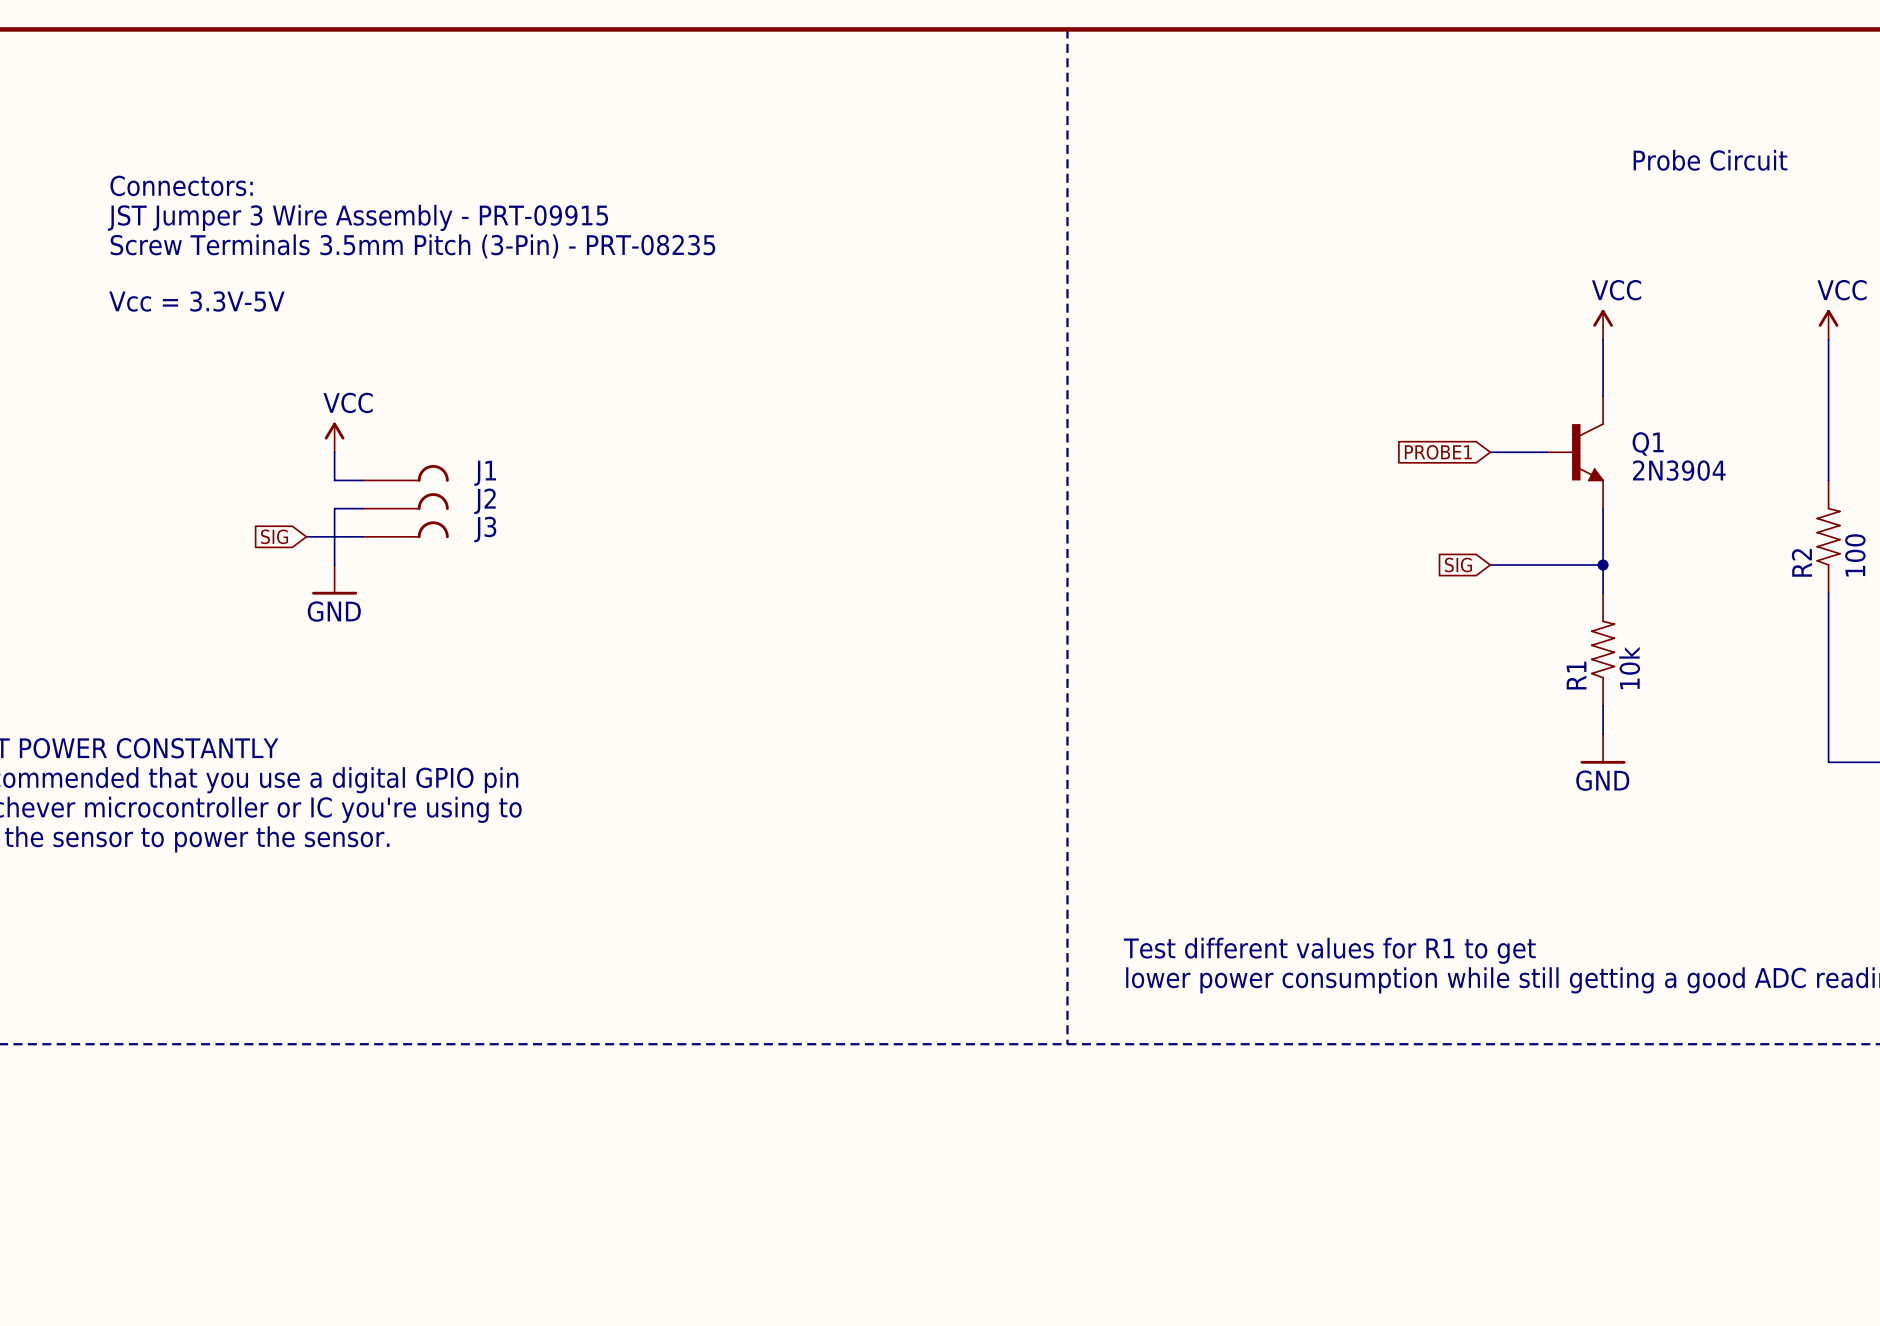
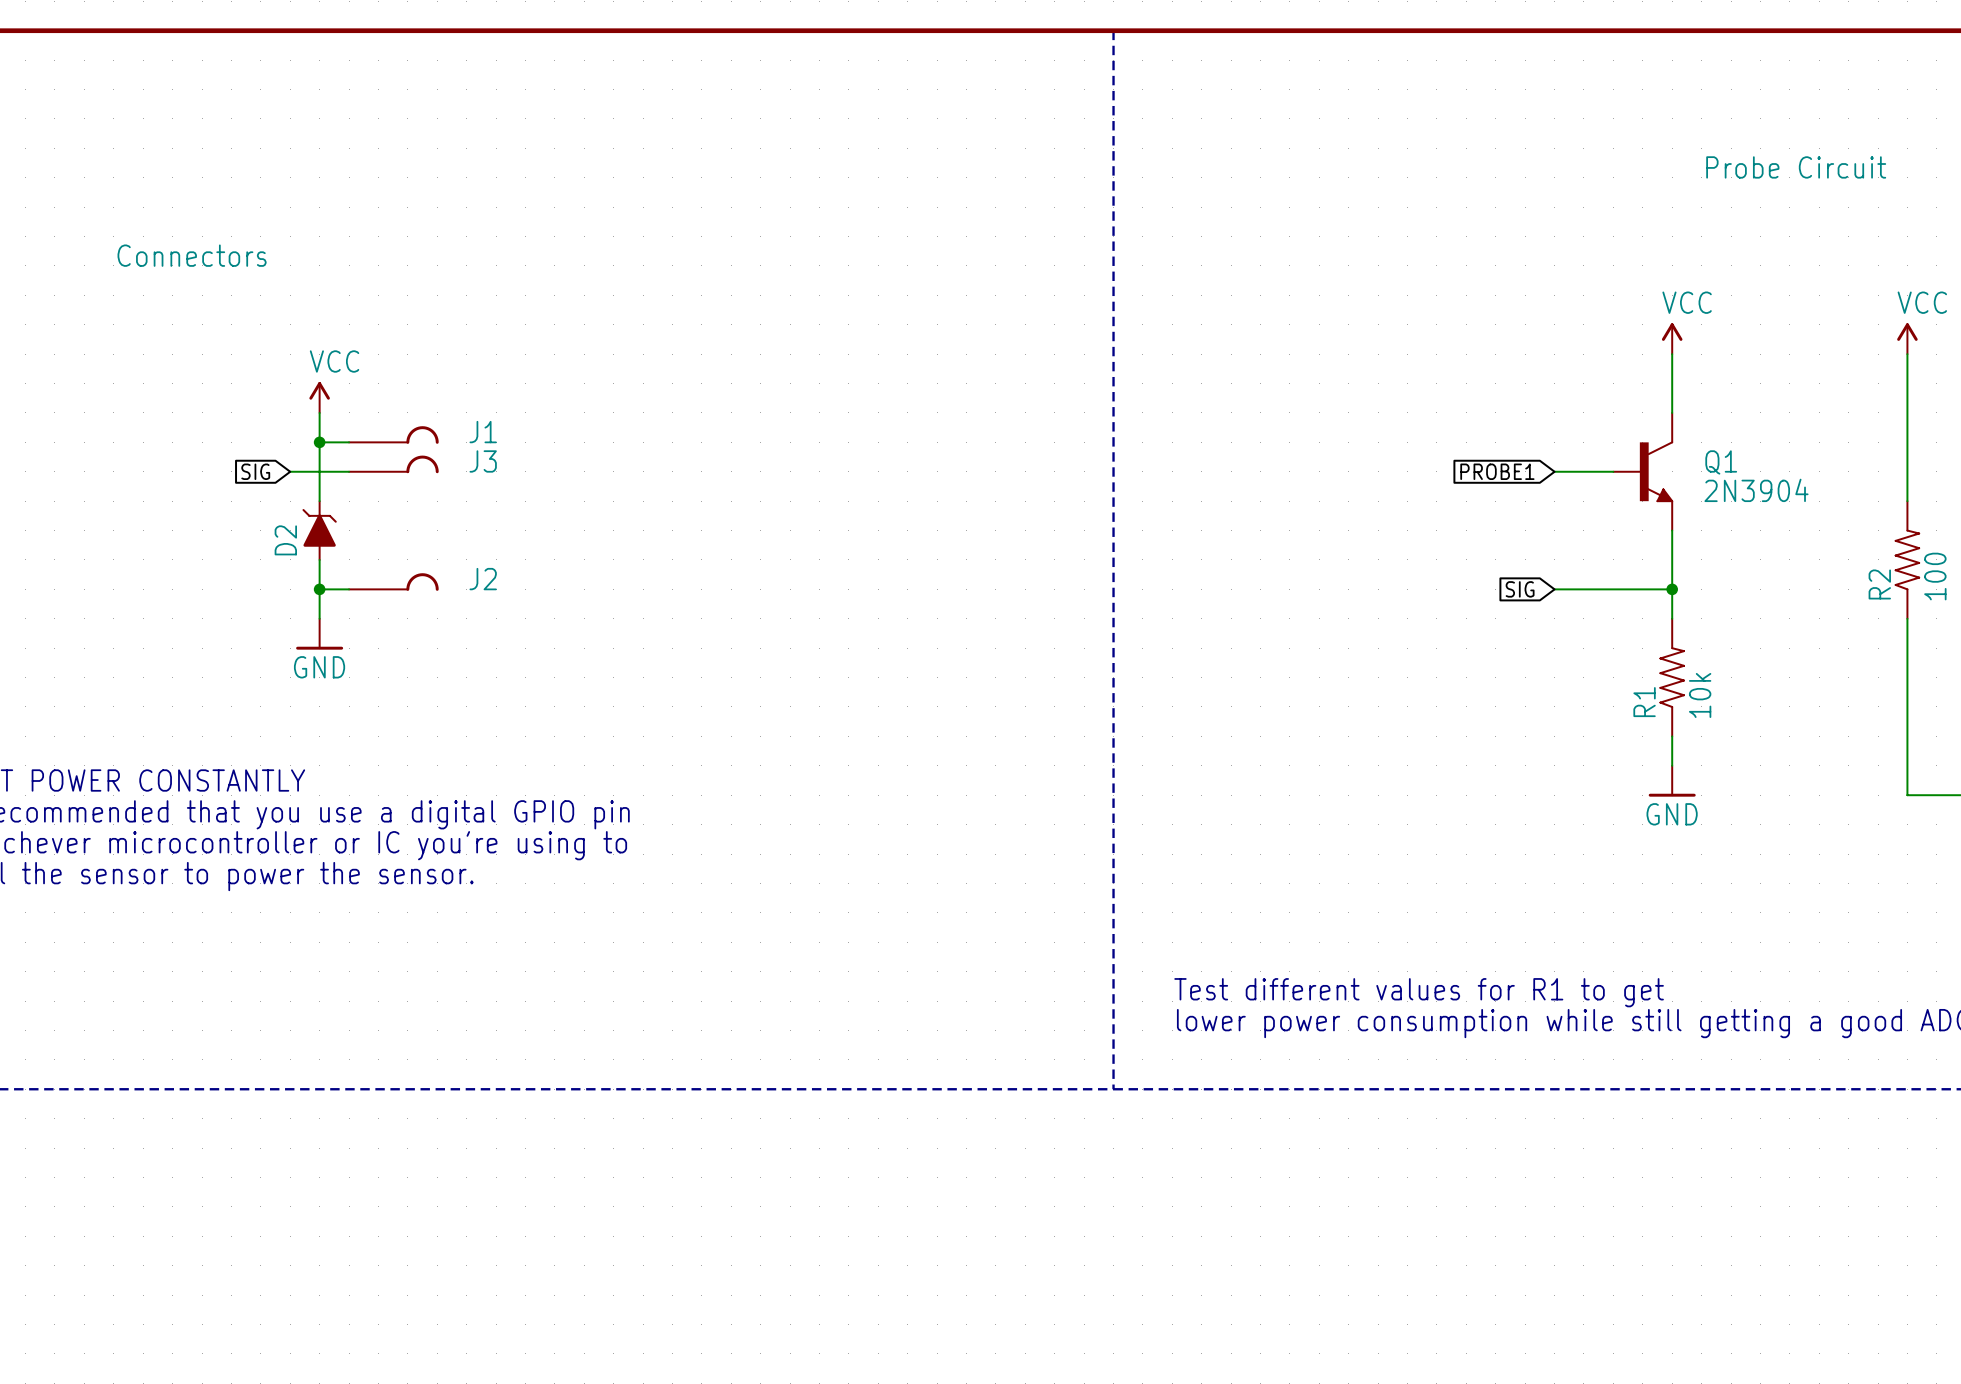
text: Connectors: (181, 185) -> none
text: JST Jumper 3 Wire Assembly - PRT-09915 (357, 217) -> none
text: Screw Terminals 3.5mm Pitch (3-Pin) - PRT-08235 (412, 246) -> Connectors (192, 255)
text: Vcc = 3.3V-5V (196, 301) -> none
wire: none -> (319, 412) (319, 501)
wire: none -> (319, 442) (349, 442)
junction: none -> (319, 442)
power symbol position: VCC (334, 437) -> VCC (319, 397)
wire: (334, 452) (334, 480) (362, 480) -> (349, 471) (290, 471)
J1 position: (405, 473) -> (393, 435)
J2 position: (405, 501) -> (393, 582)
D2: none -> (319, 530)
wire: (362, 508) (334, 508) (334, 565) -> (319, 589) (349, 589)
J3 position: (405, 529) -> (393, 464)
global label position: SIG (274, 536) -> SIG (255, 471)
wire: (306, 536) (362, 536) -> (319, 559) (319, 618)
junction: none -> (319, 589)
power symbol position: GND (334, 579) -> GND (319, 634)

